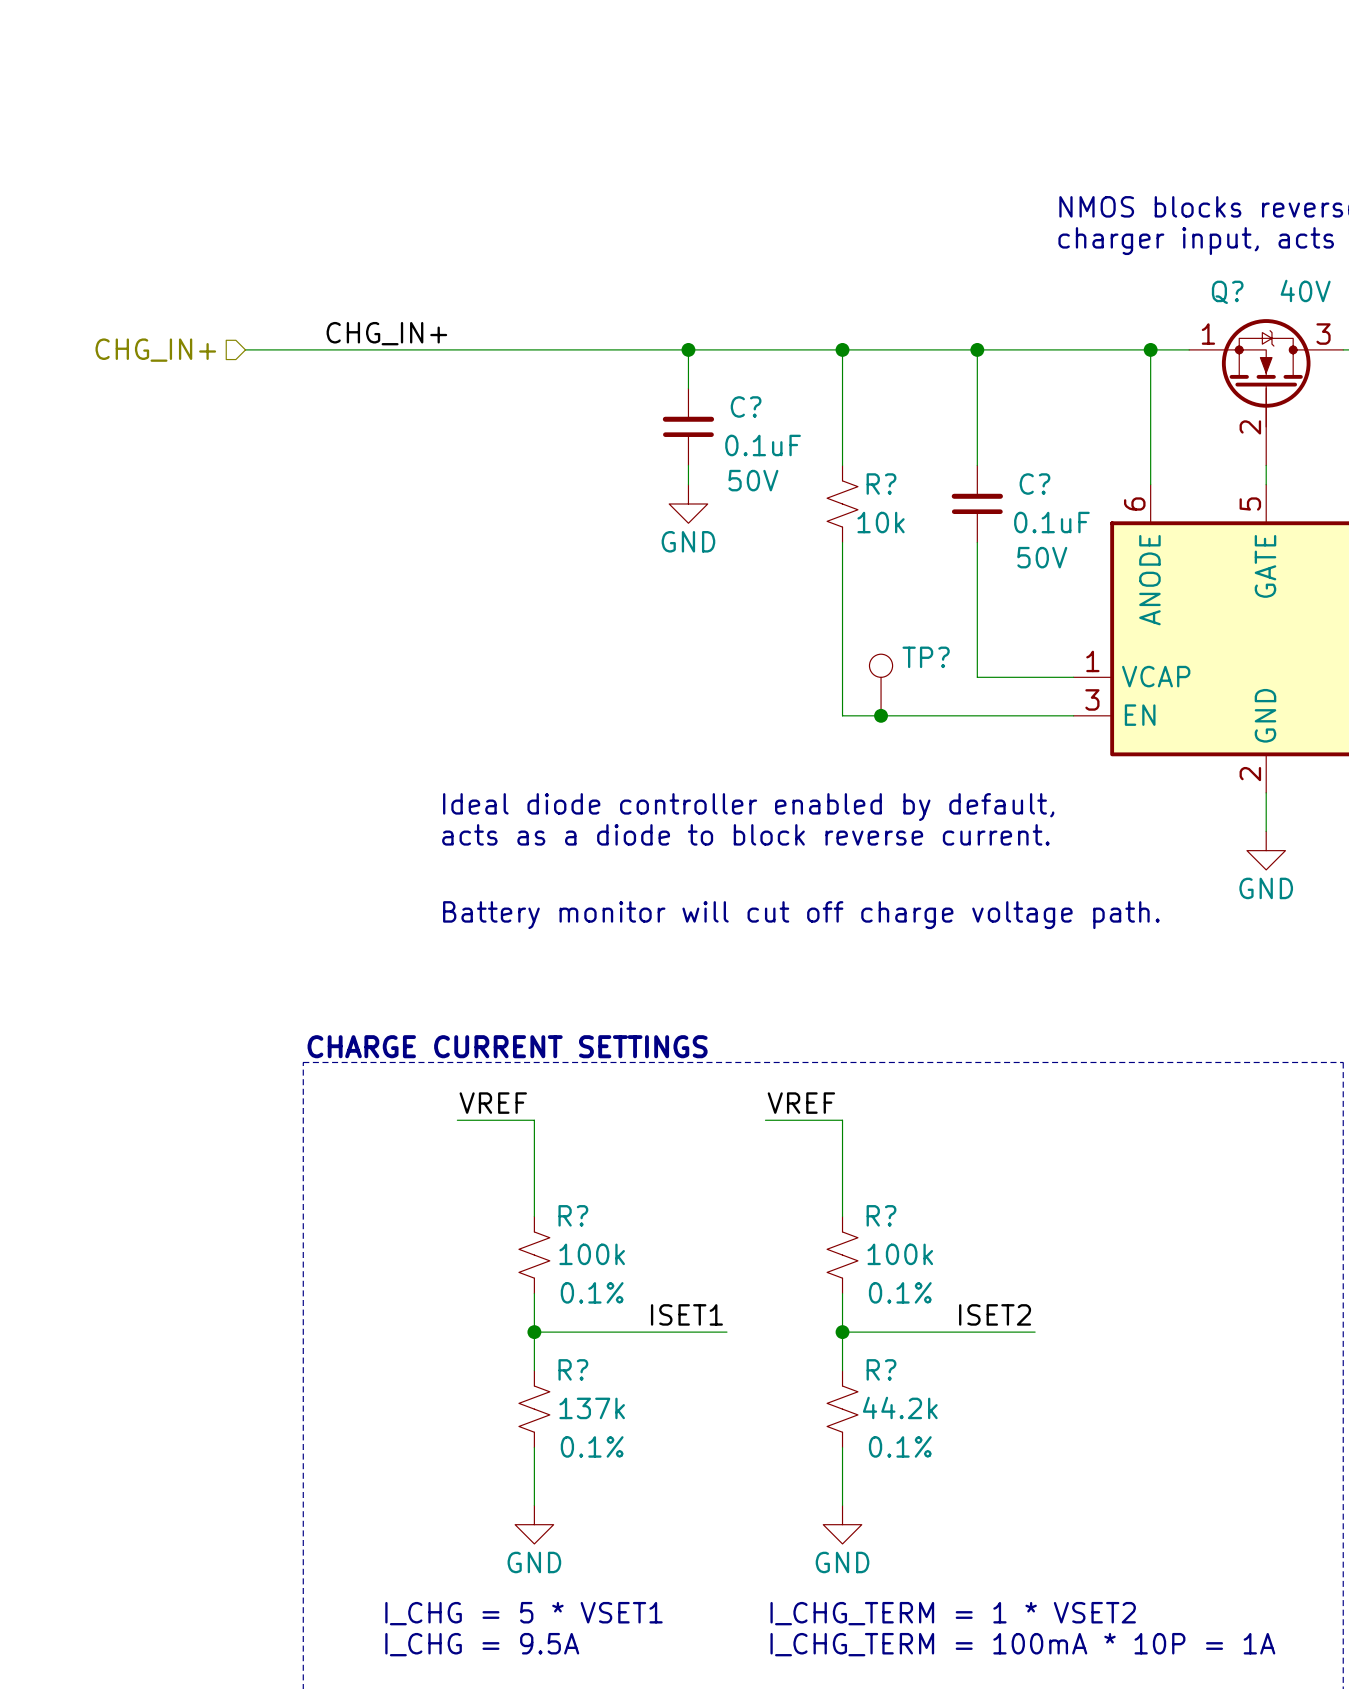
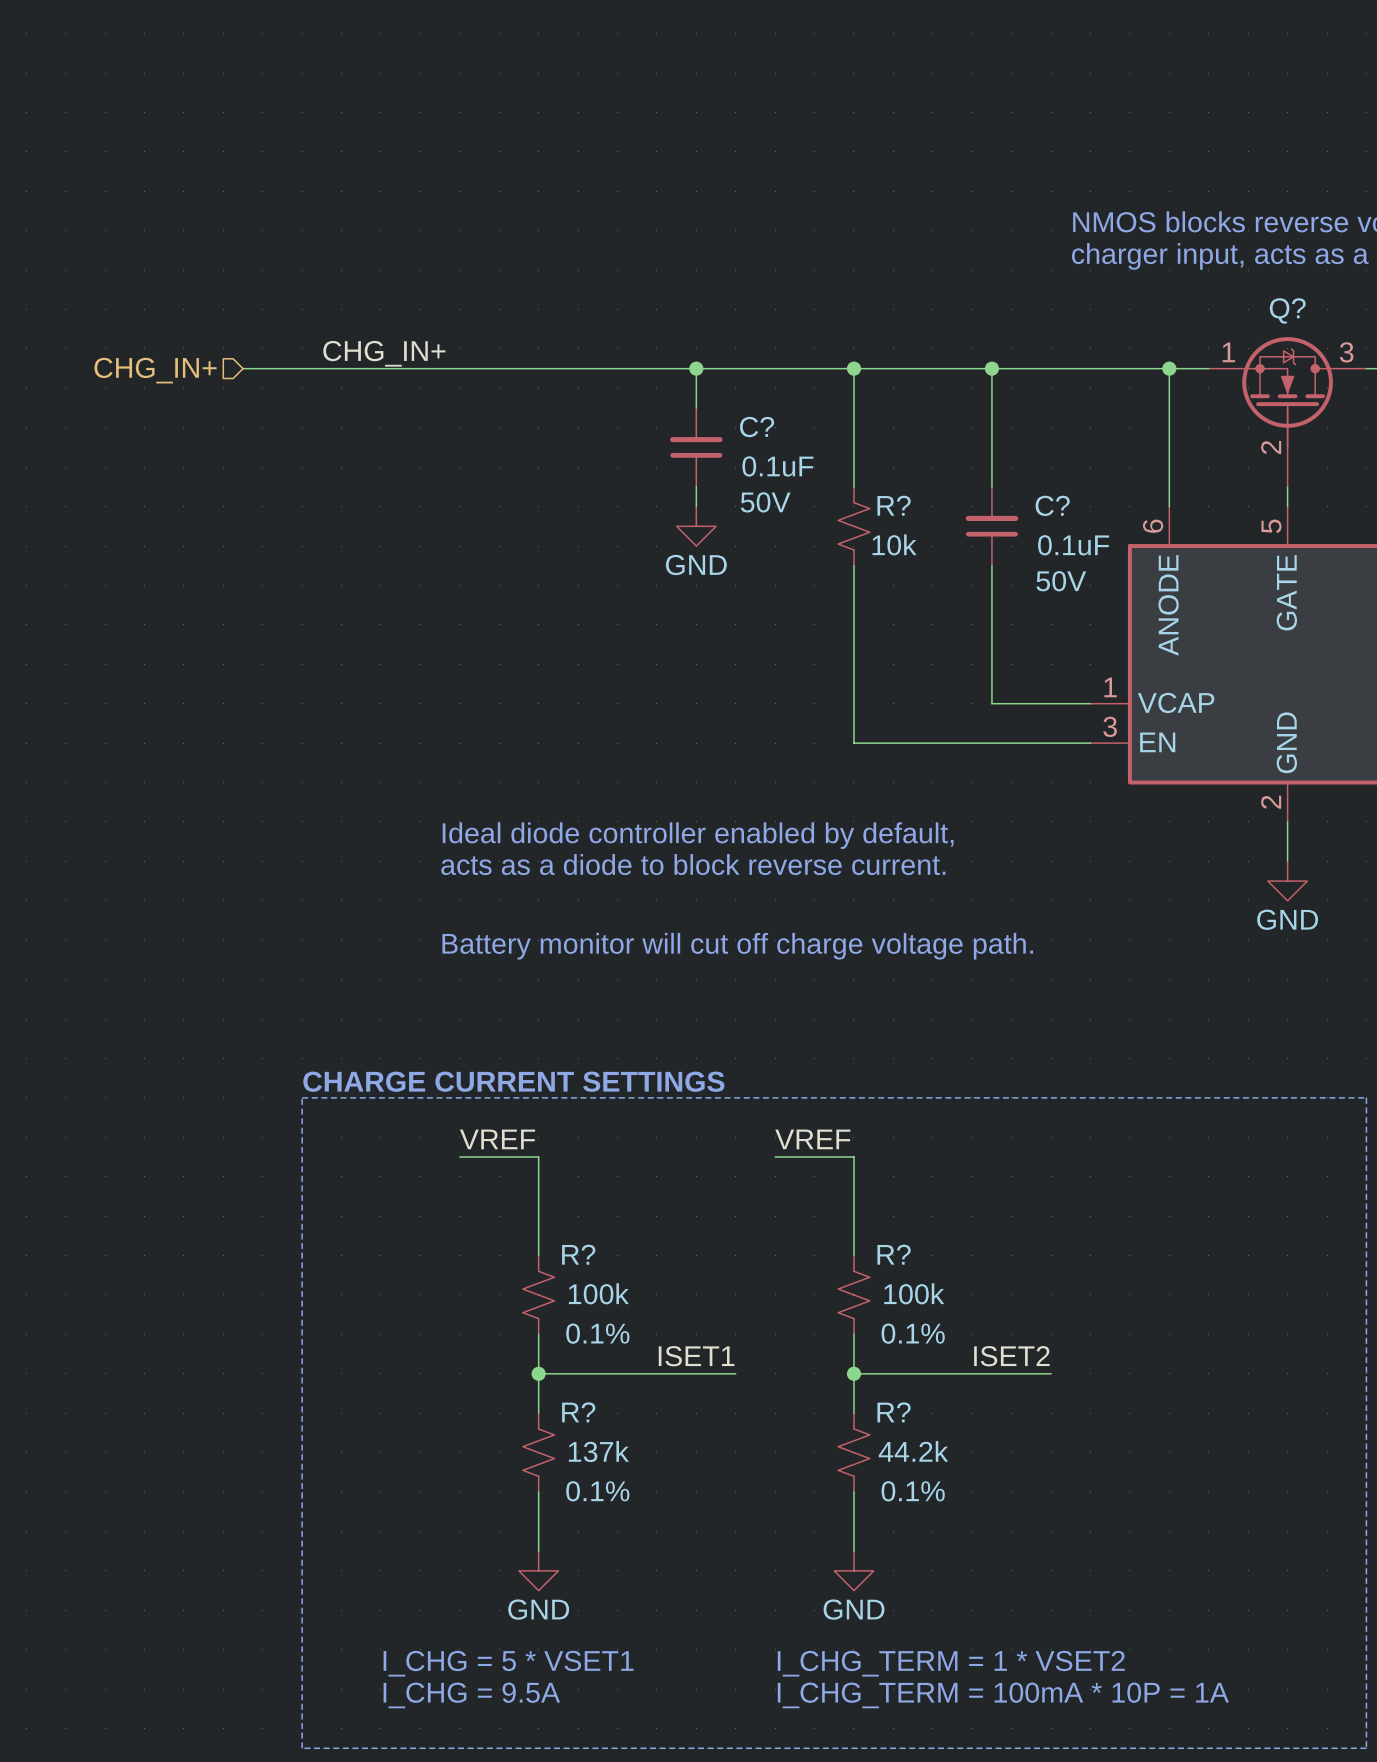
Q? text: 40V (1305, 290) -> none
Q? name position: Q? (1227, 292) -> Q? (1287, 310)
TP?: (881, 685) -> none
junction: (881, 715) -> none

